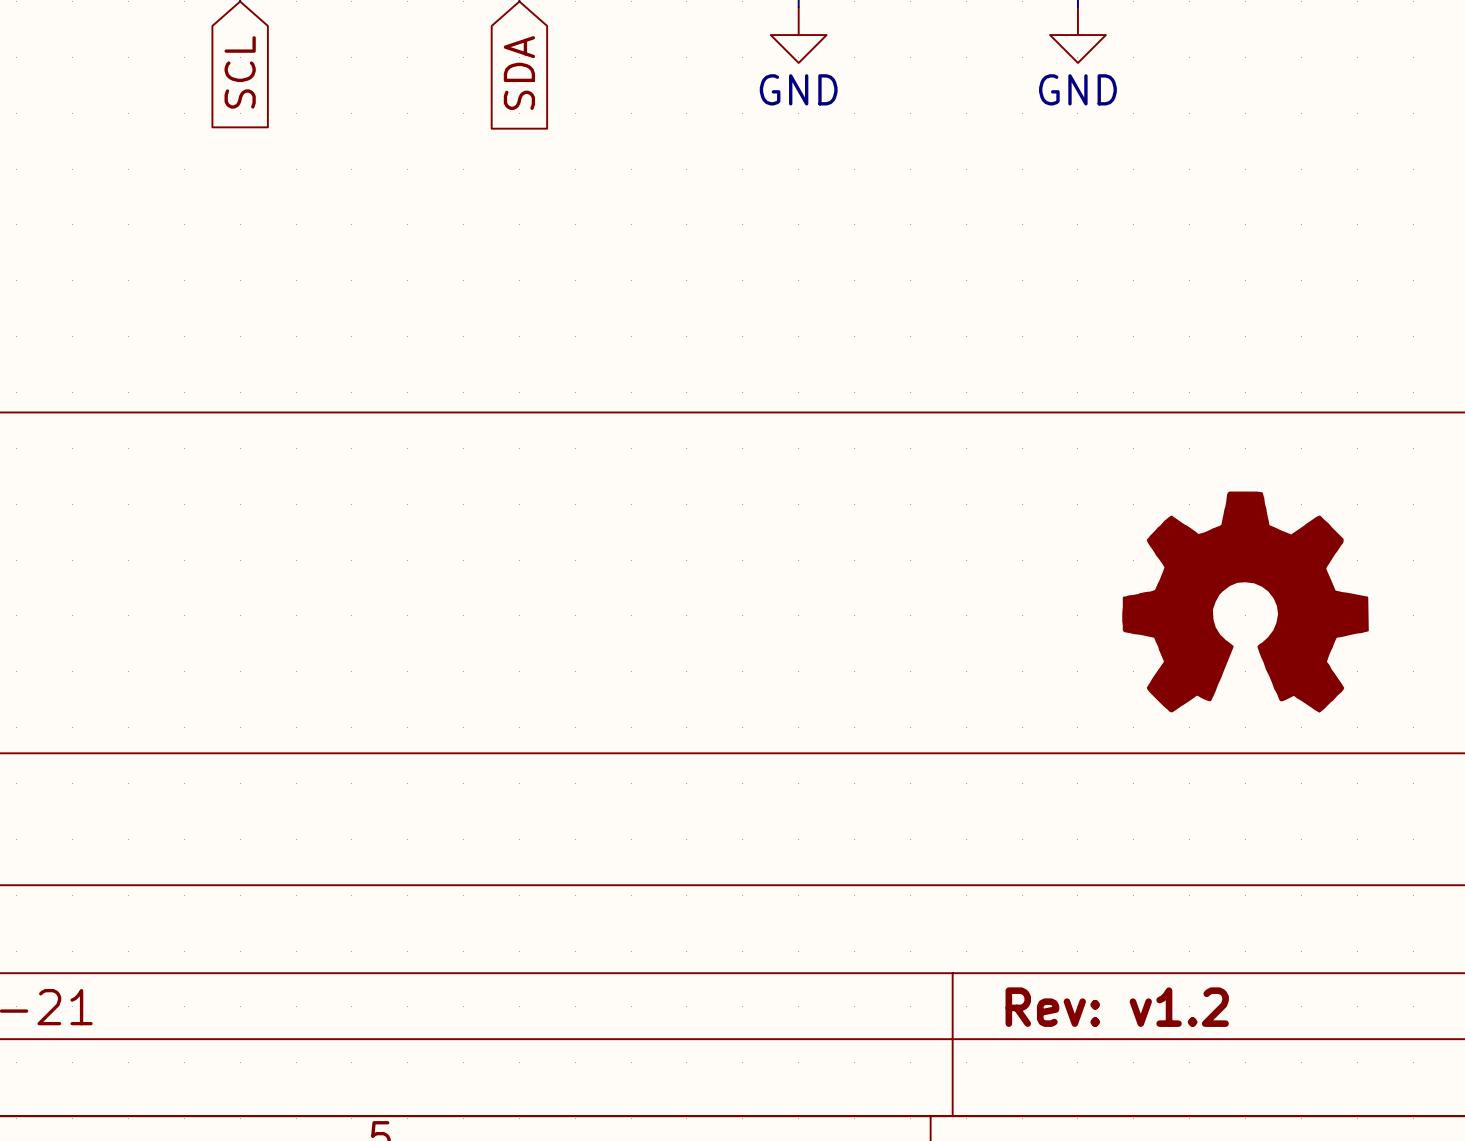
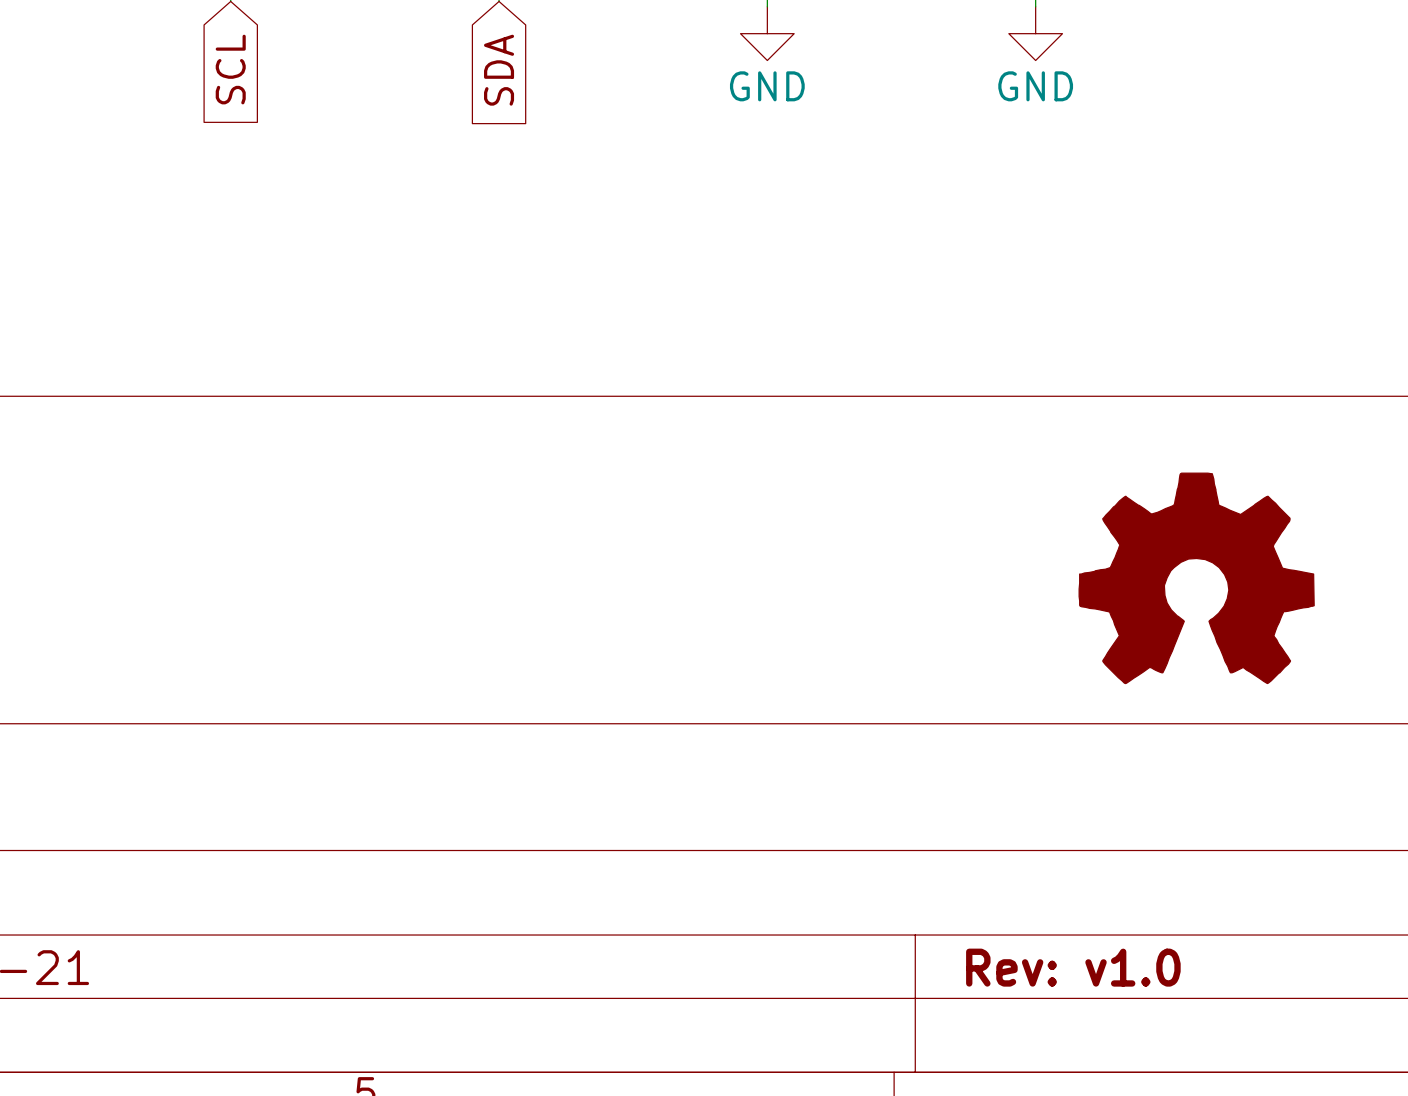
title block: Rev: v1.2 (1117, 1007) -> Rev: v1.0 (1073, 967)

